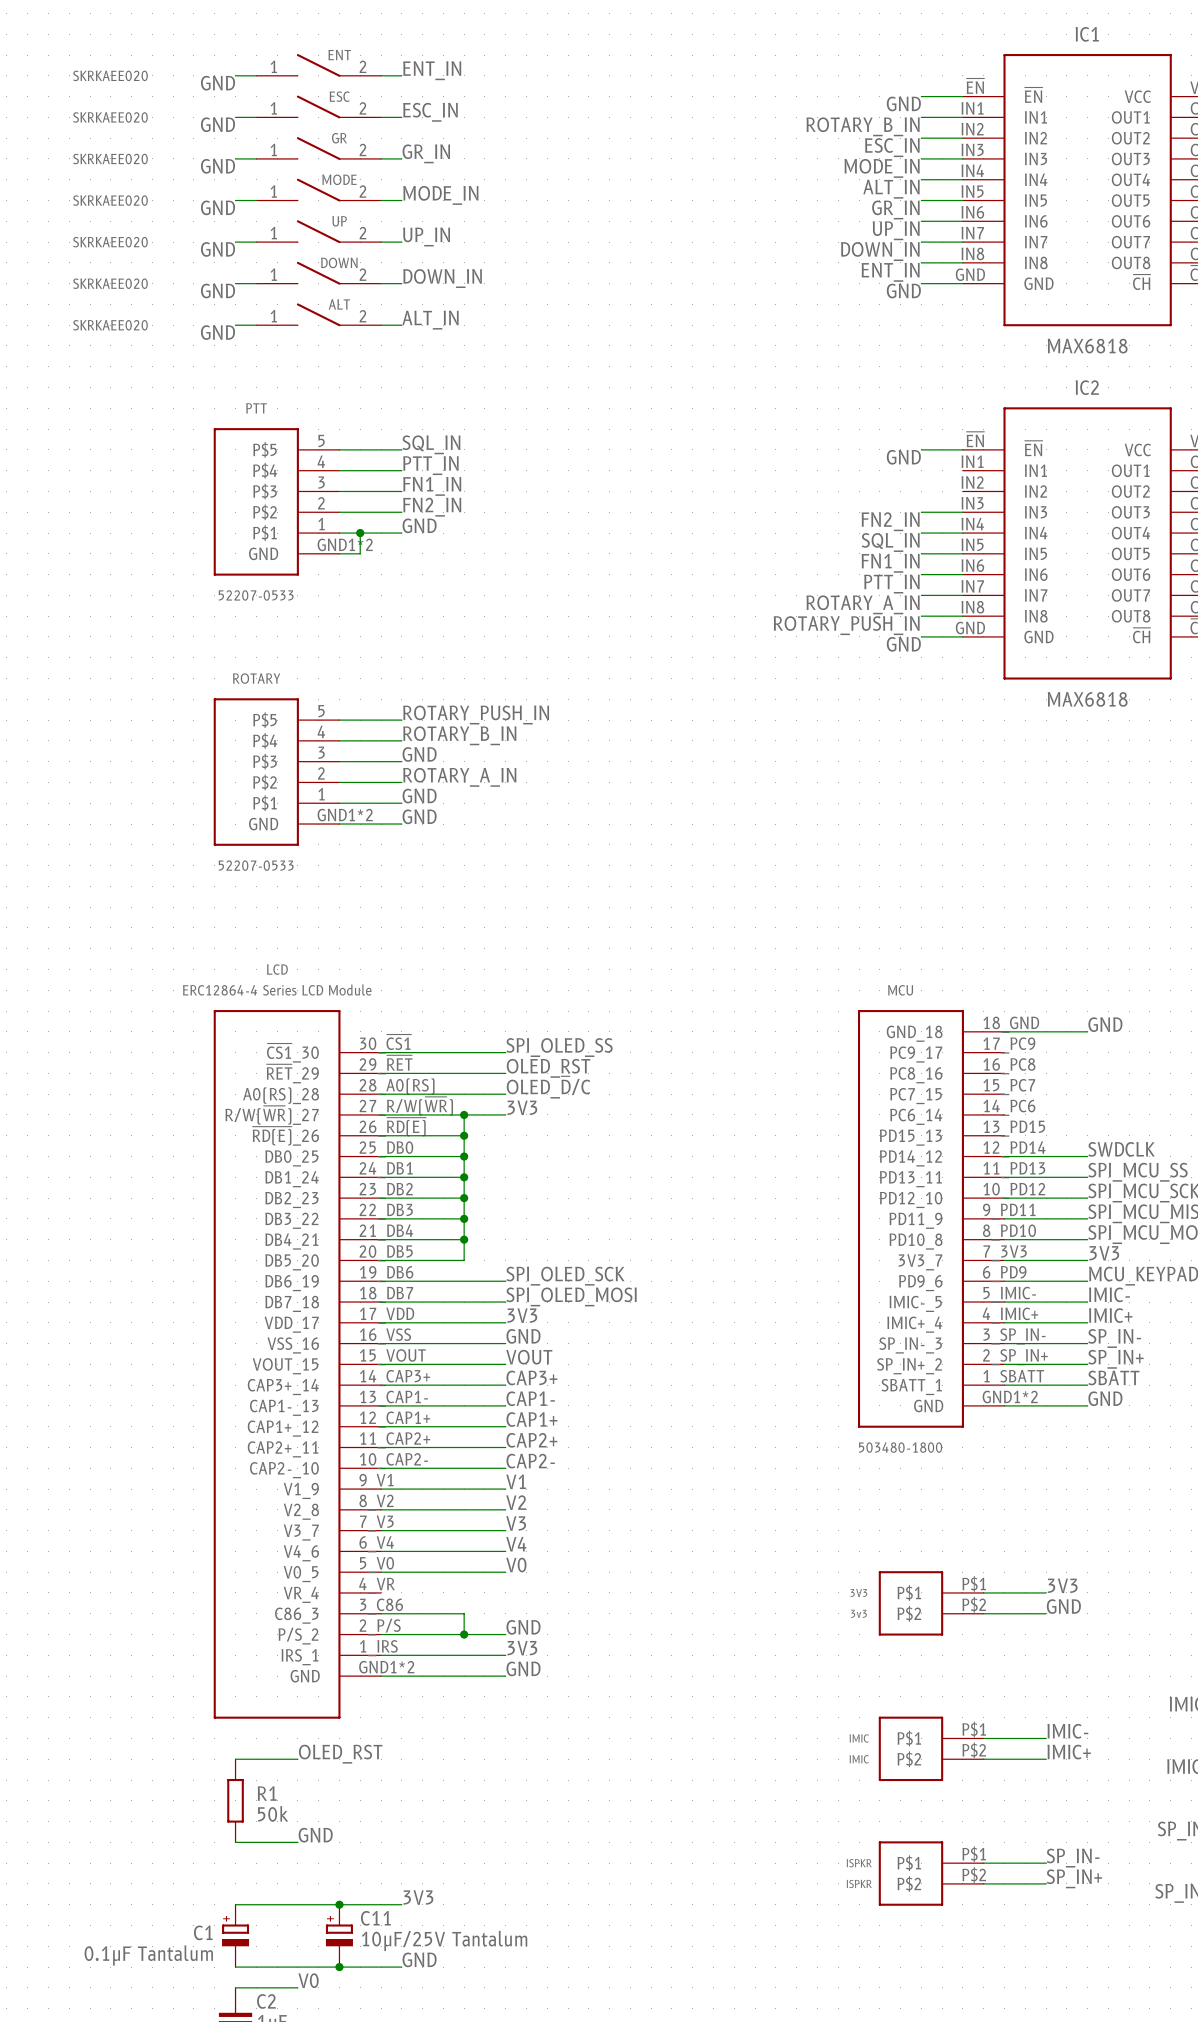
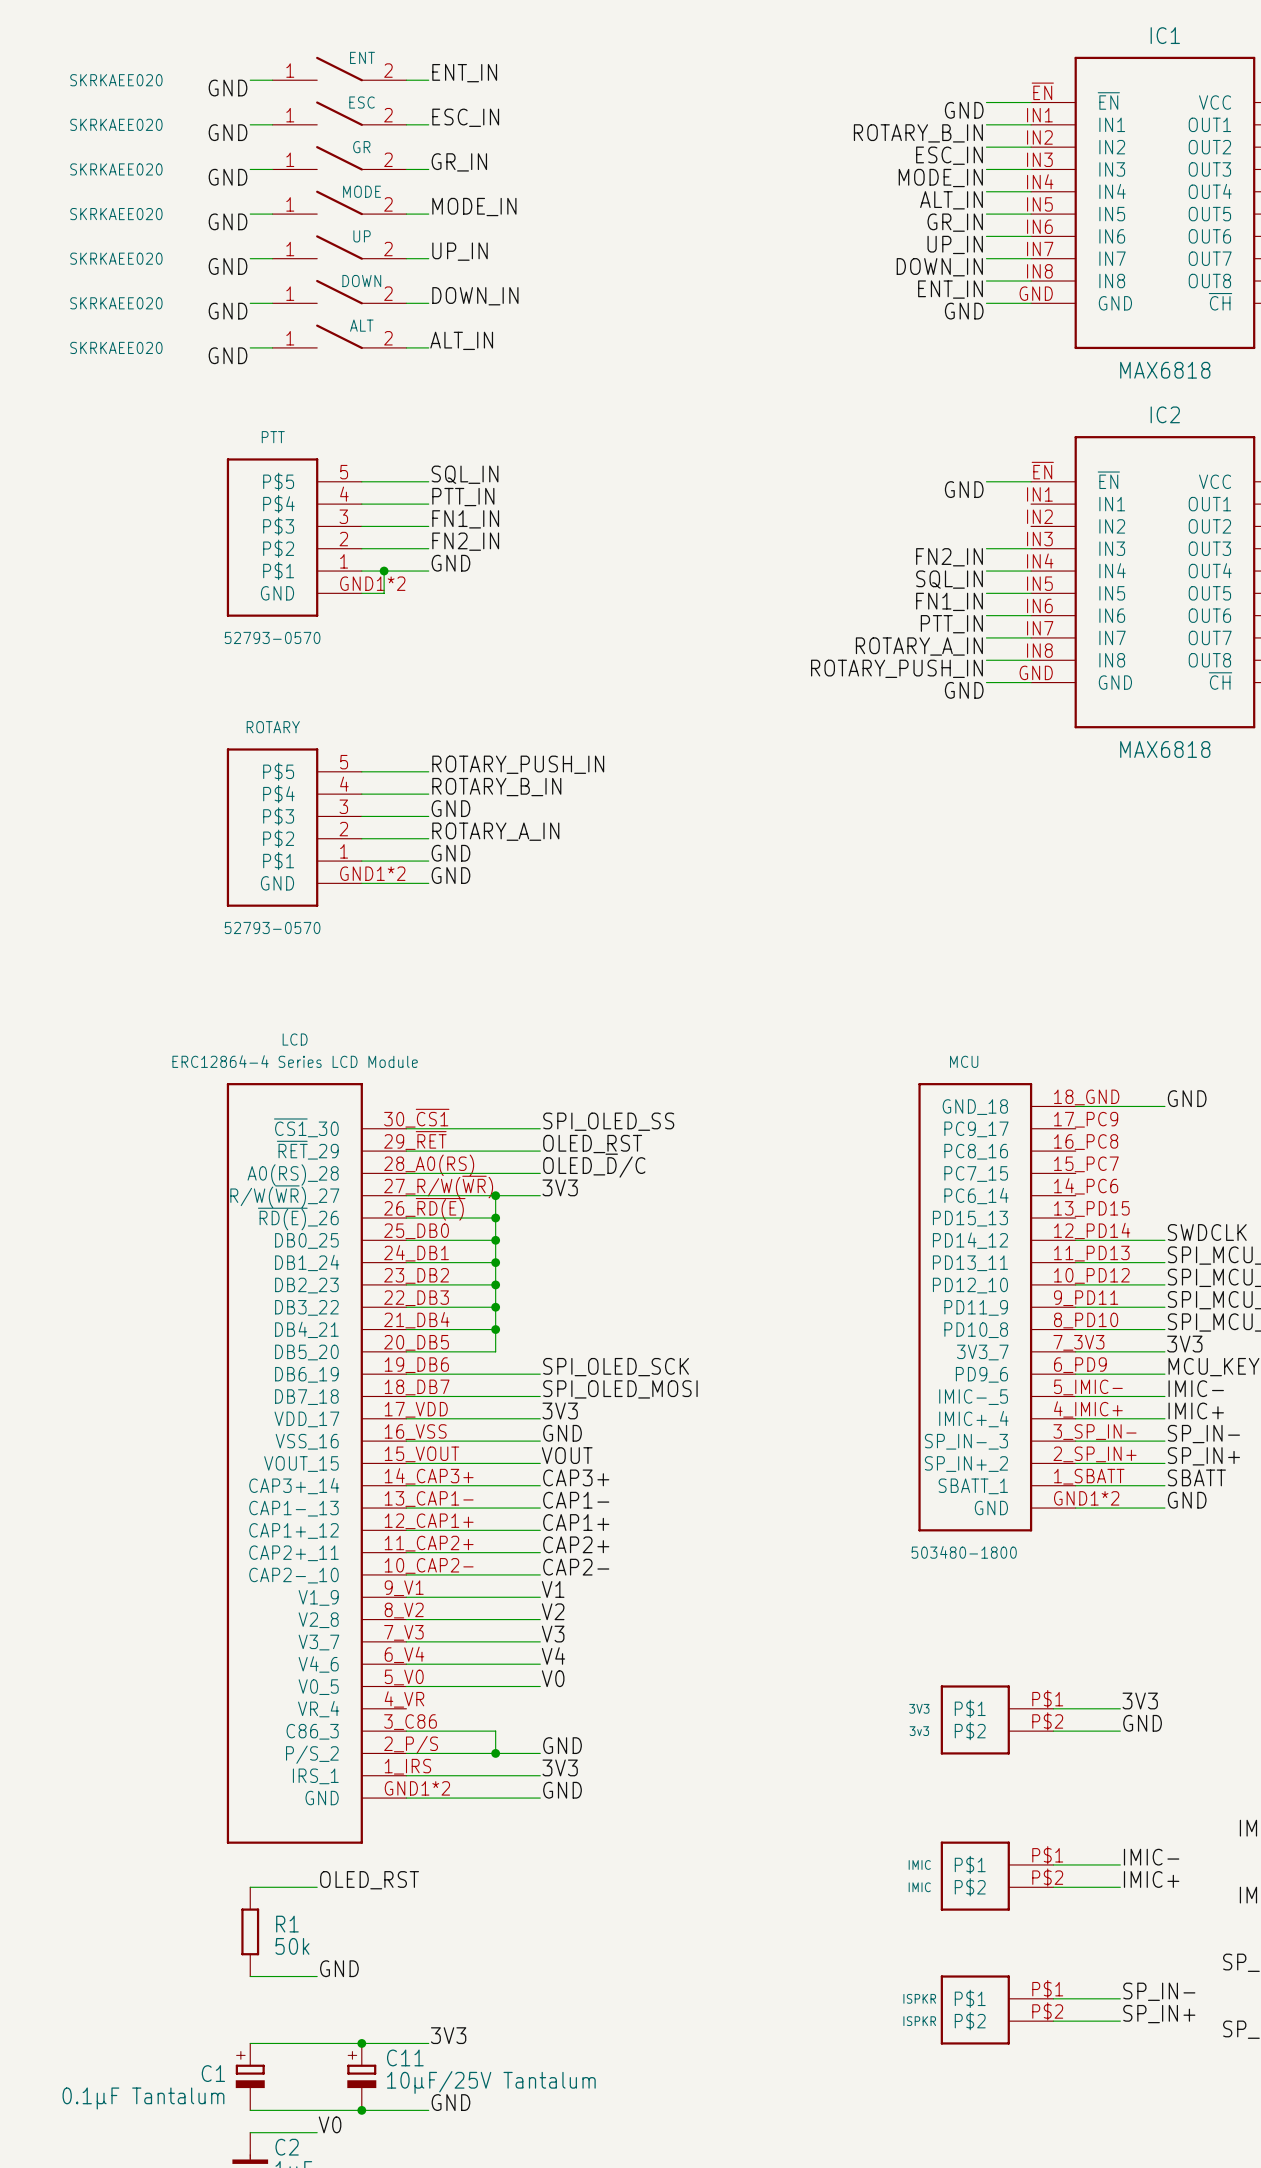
PTT value: 52207-0533 (256, 595) -> 52793-0570 (272, 637)
ROTARY value: 52207-0533 (256, 865) -> 52793-0570 (272, 927)

